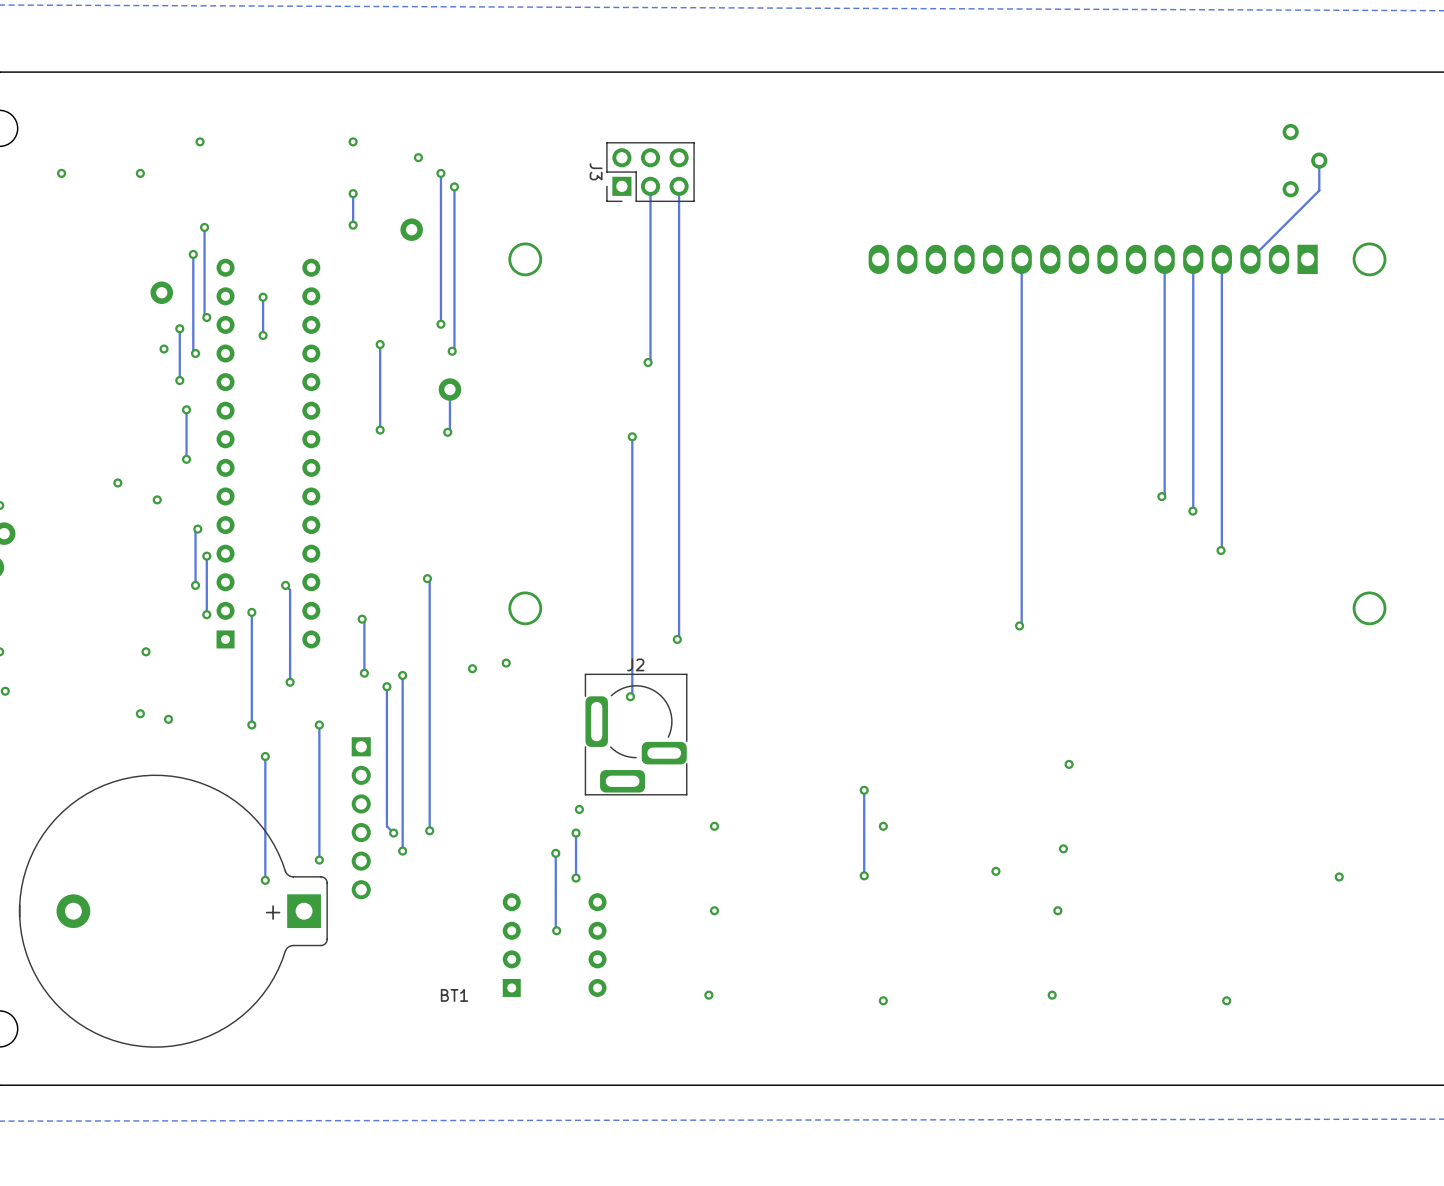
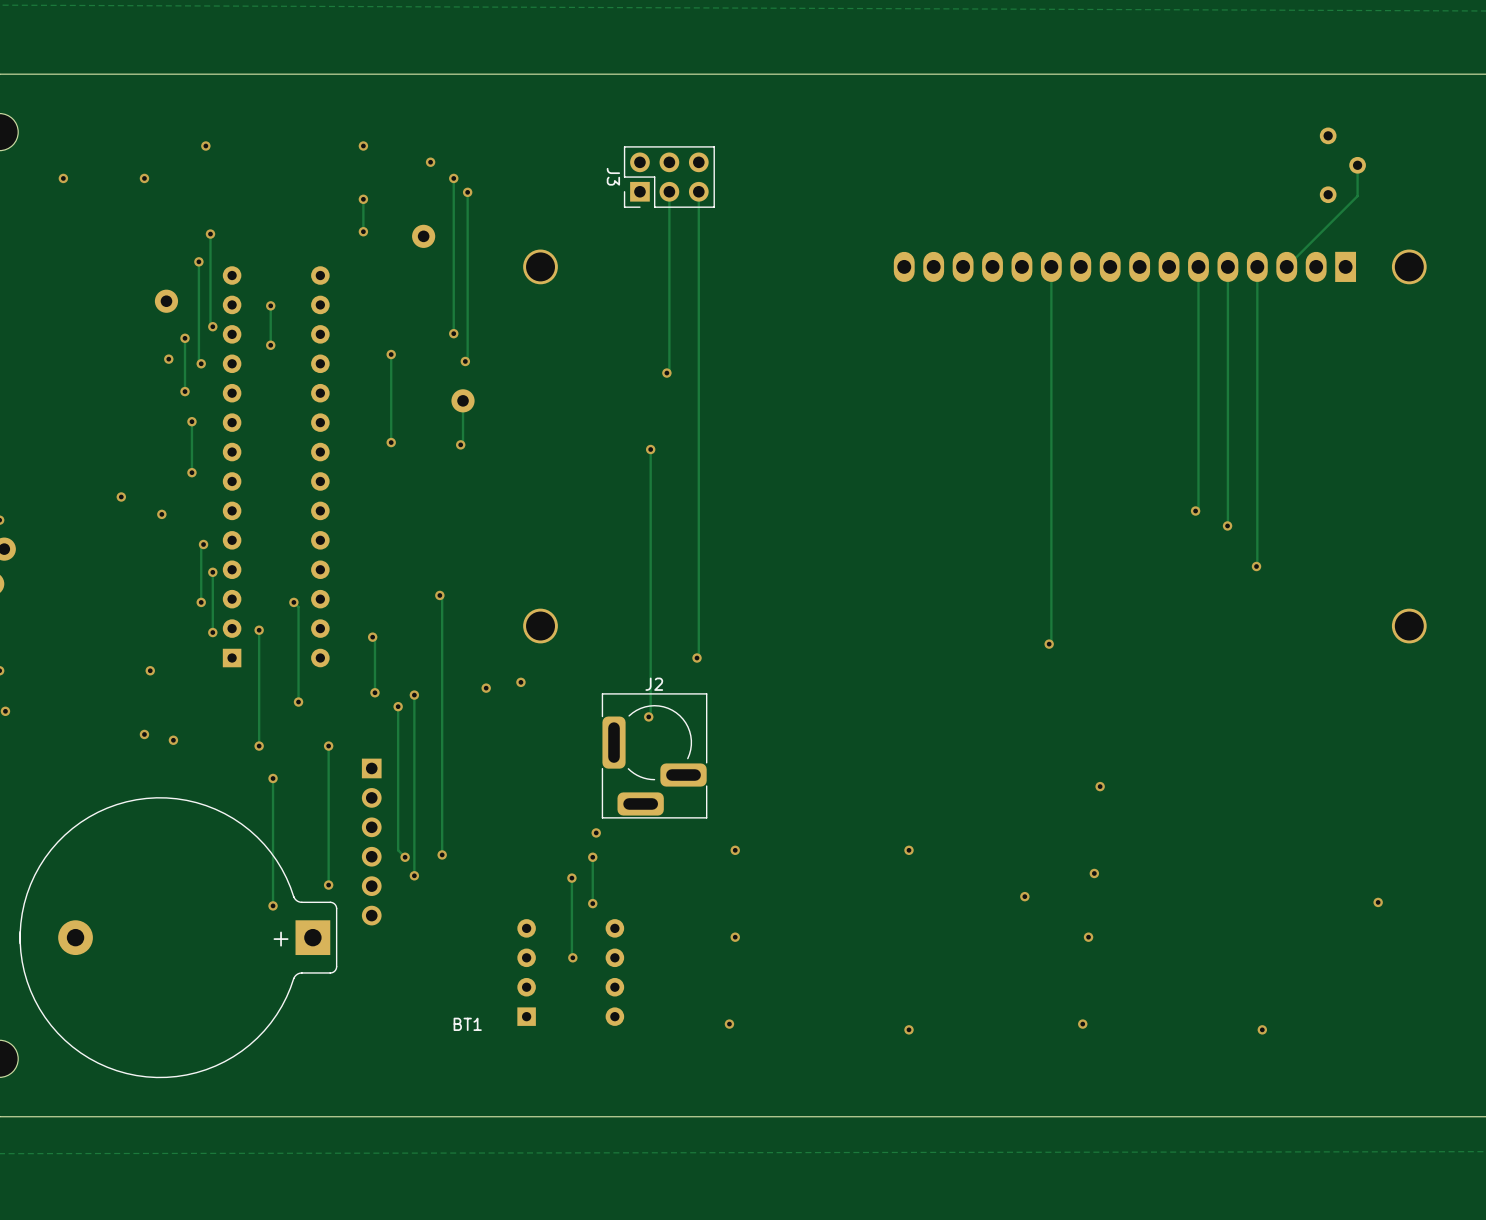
track: (864, 790) (864, 875) -> none
via: (864, 790) -> none
via: (864, 875) -> none

